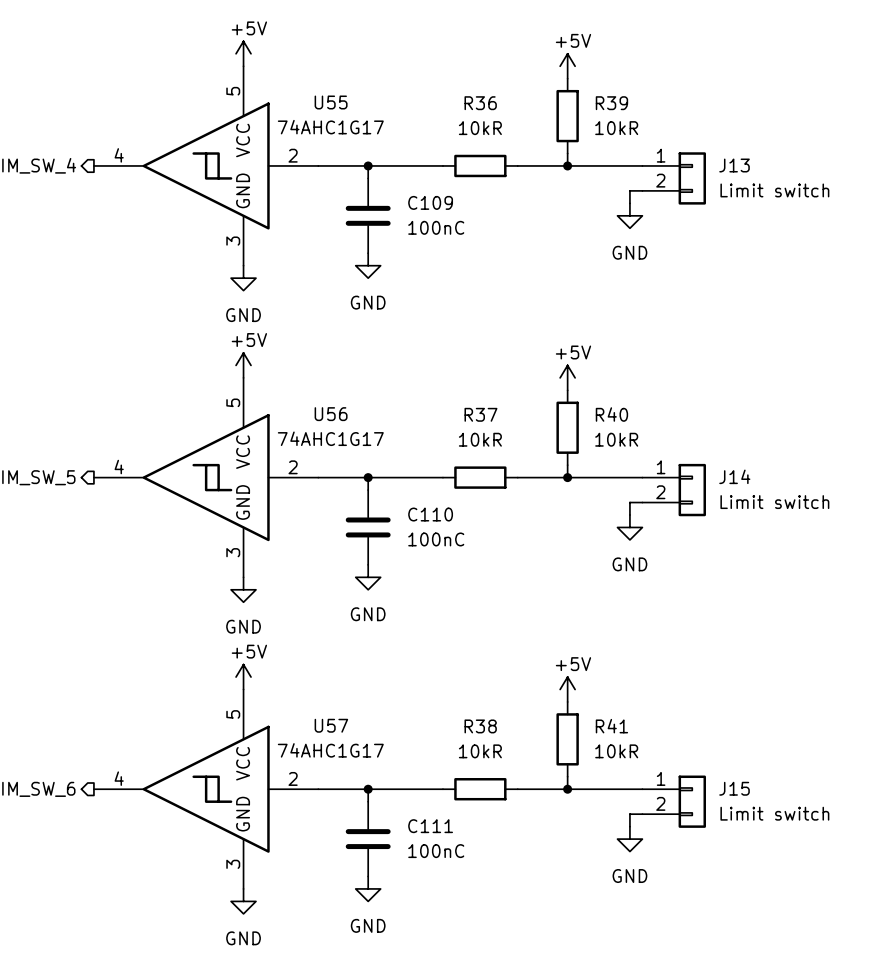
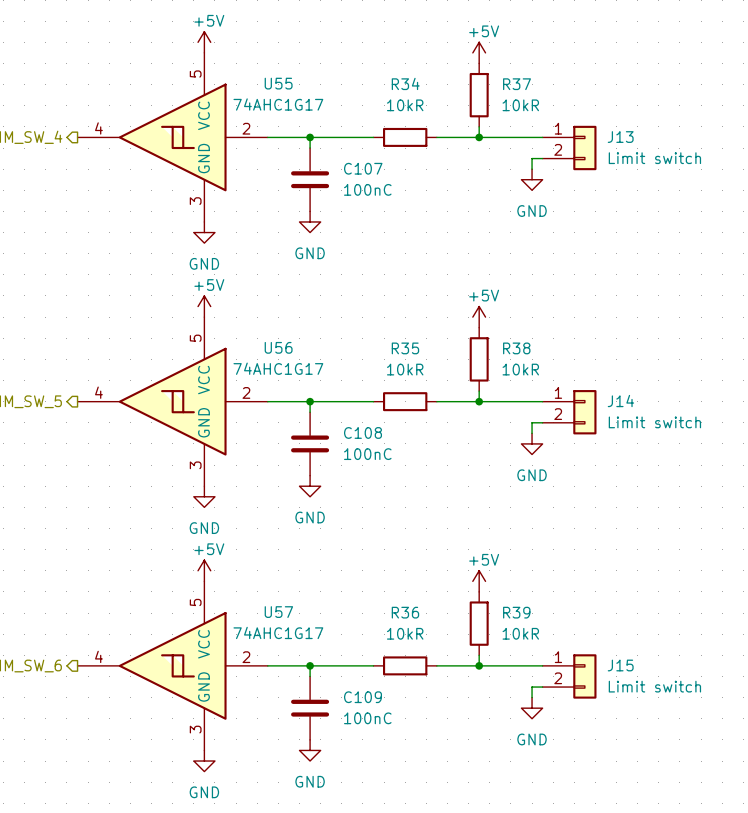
R36 name: R36 (480, 103) -> R34 (405, 83)
R39 name: R39 (611, 103) -> R37 (517, 84)
C109 name: C109 (430, 202) -> C107 (363, 168)
R37 name: R37 (480, 414) -> R35 (405, 348)
R40 name: R40 (611, 414) -> R38 (516, 348)
C110 name: C110 (430, 514) -> C108 (363, 432)
R38 name: R38 (480, 726) -> R36 (405, 612)
R41 name: R41 (611, 726) -> R39 (516, 612)
C111 name: C111 (430, 826) -> C109 (363, 697)

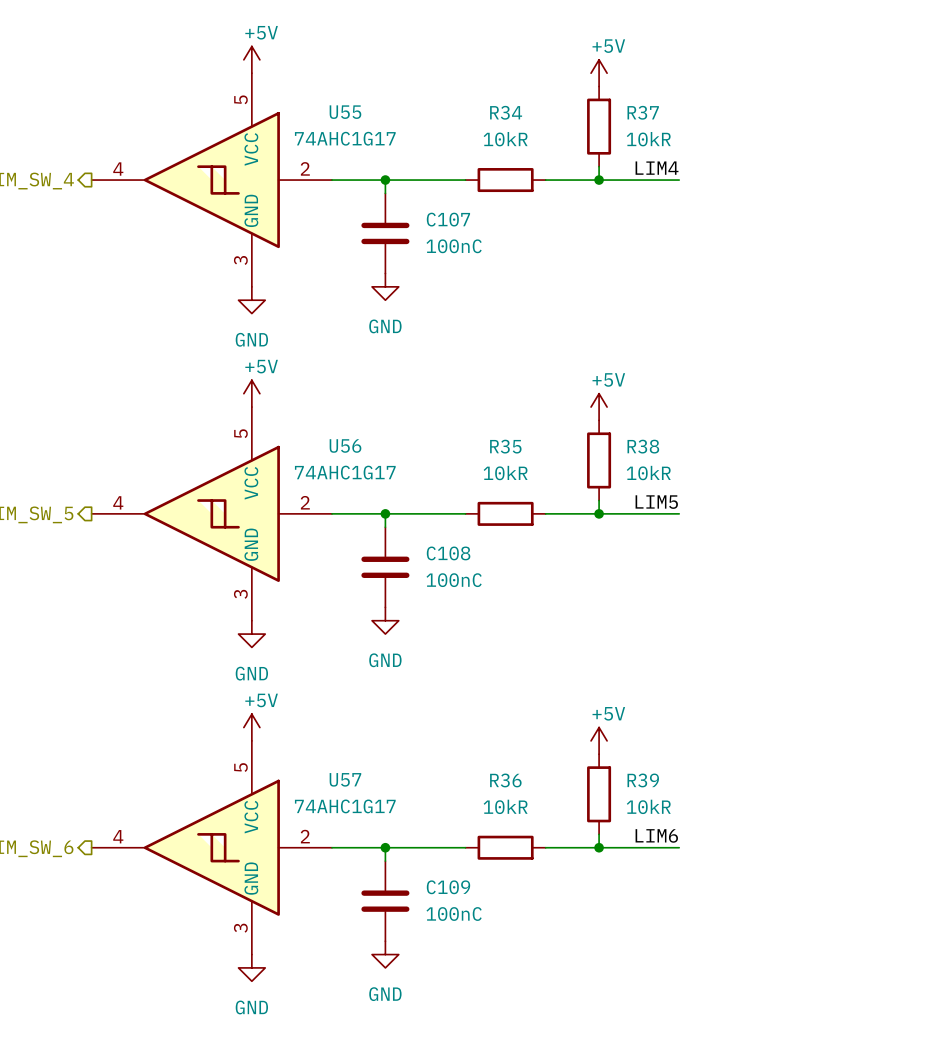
label: none -> LIM4 (657, 168)
J13: Limit switch (569, 148) -> none
wire: (542, 158) (532, 158) (532, 169) -> none
power symbol: GND (532, 179) -> none
label: none -> LIM5 (656, 502)
J14: Limit switch (569, 412) -> none
wire: (542, 422) (532, 422) (532, 433) -> none
power symbol: GND (532, 443) -> none
label: none -> LIM6 (656, 835)
J15: Limit switch (569, 676) -> none
wire: (542, 687) (532, 687) (532, 697) -> none
power symbol: GND (532, 708) -> none

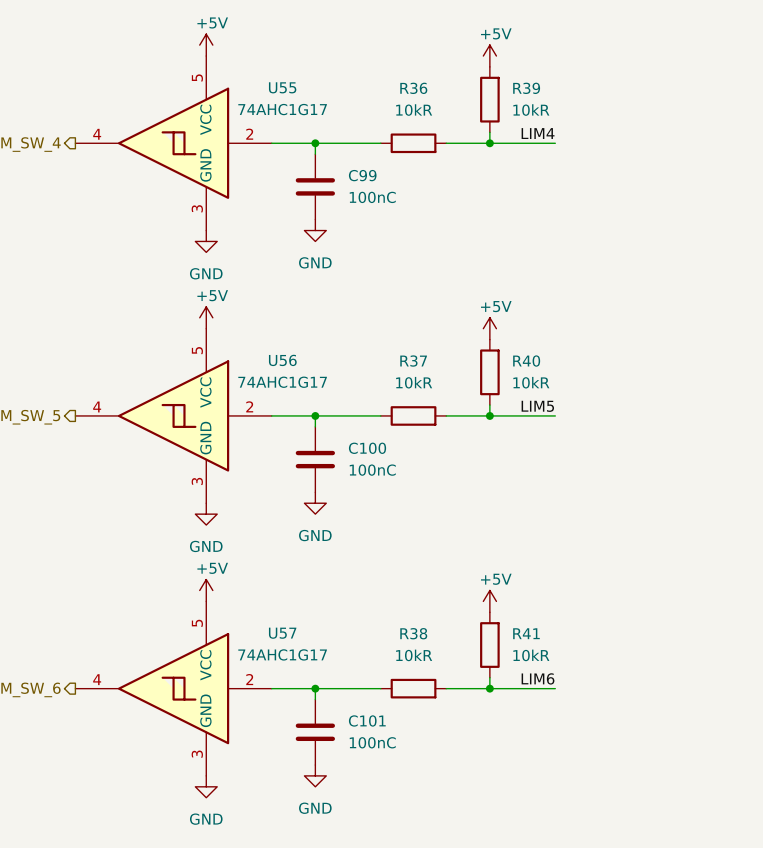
R34 name: R34 (506, 112) -> R36 (413, 88)
R37 name: R37 (643, 112) -> R39 (526, 88)
C107 name: C107 (448, 219) -> C99 (362, 175)
R35 name: R35 (505, 446) -> R37 (413, 361)
R38 name: R38 (643, 446) -> R40 (526, 361)
C108 name: C108 (448, 553) -> C100 (367, 448)
R36 name: R36 (505, 780) -> R38 (413, 633)
R39 name: R39 (643, 780) -> R41 (526, 633)
C109 name: C109 (448, 887) -> C101 (367, 720)

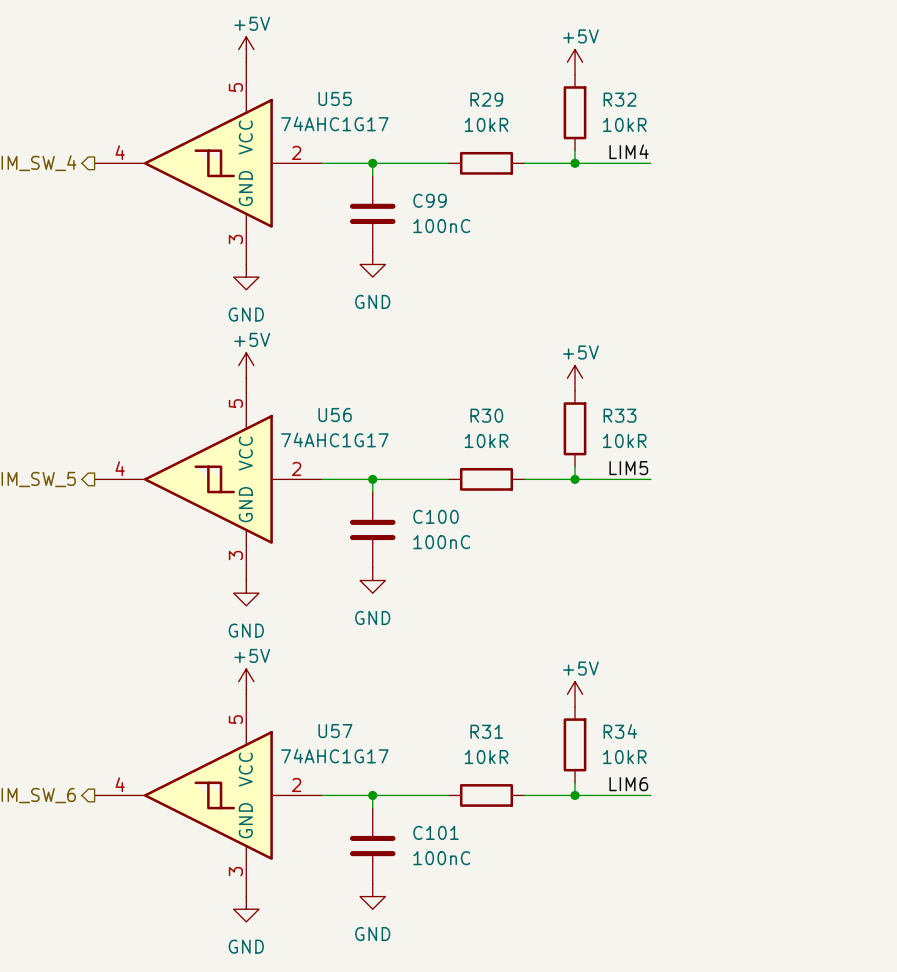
R36 name: R36 (413, 88) -> R29 (486, 99)
R39 name: R39 (526, 88) -> R32 (619, 99)
R37 name: R37 (413, 361) -> R30 (486, 415)
R40 name: R40 (526, 361) -> R33 (619, 415)
R38 name: R38 (413, 633) -> R31 (486, 731)
R41 name: R41 (526, 633) -> R34 (620, 731)

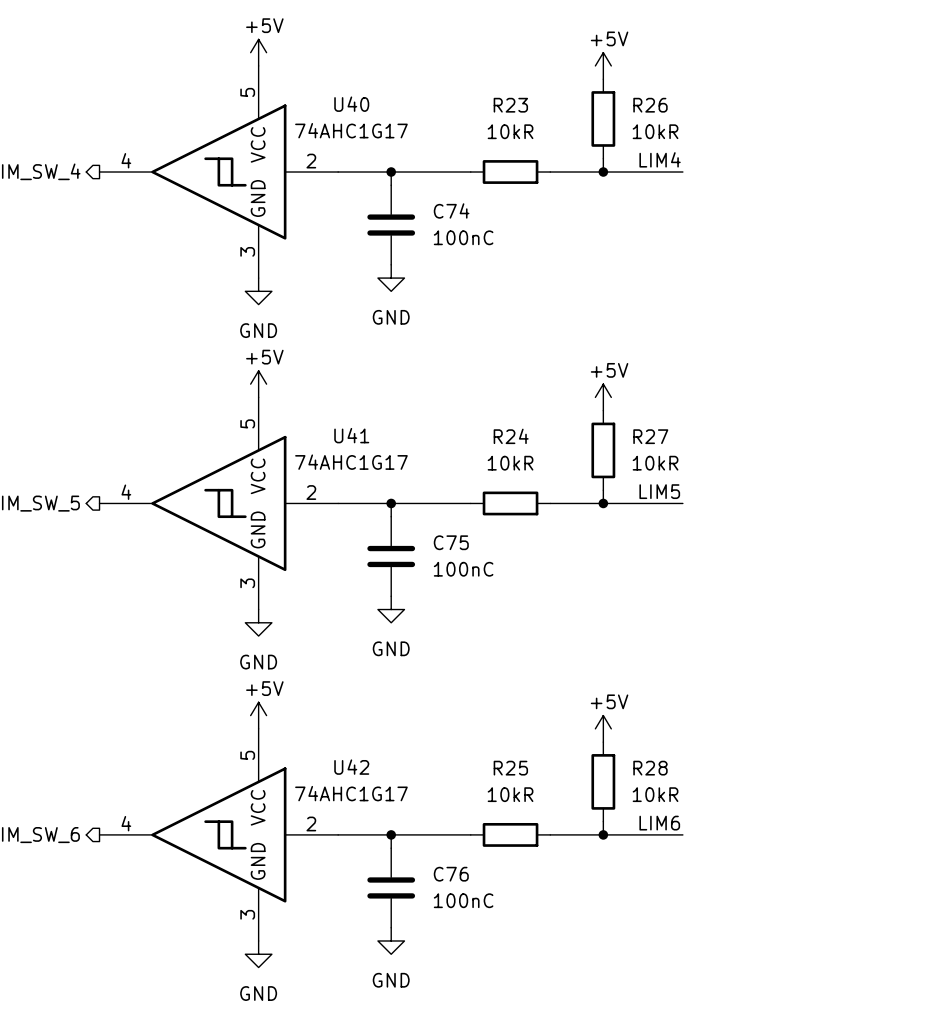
U55 name: U55 (335, 98) -> U40 (351, 104)
R29 name: R29 (486, 99) -> R23 (510, 105)
R32 name: R32 (619, 99) -> R26 (650, 105)
C99 name: C99 (430, 200) -> C74 (451, 210)
U56 name: U56 (335, 415) -> U41 (351, 435)
R30 name: R30 (486, 415) -> R24 (511, 436)
R33 name: R33 (619, 415) -> R27 (650, 436)
C100 name: C100 (436, 516) -> C75 (451, 542)
U57 name: U57 (335, 731) -> U42 (351, 767)
R31 name: R31 (486, 731) -> R25 (510, 768)
R34 name: R34 (620, 731) -> R28 (650, 768)
C101 name: C101 (436, 832) -> C76 (451, 874)

